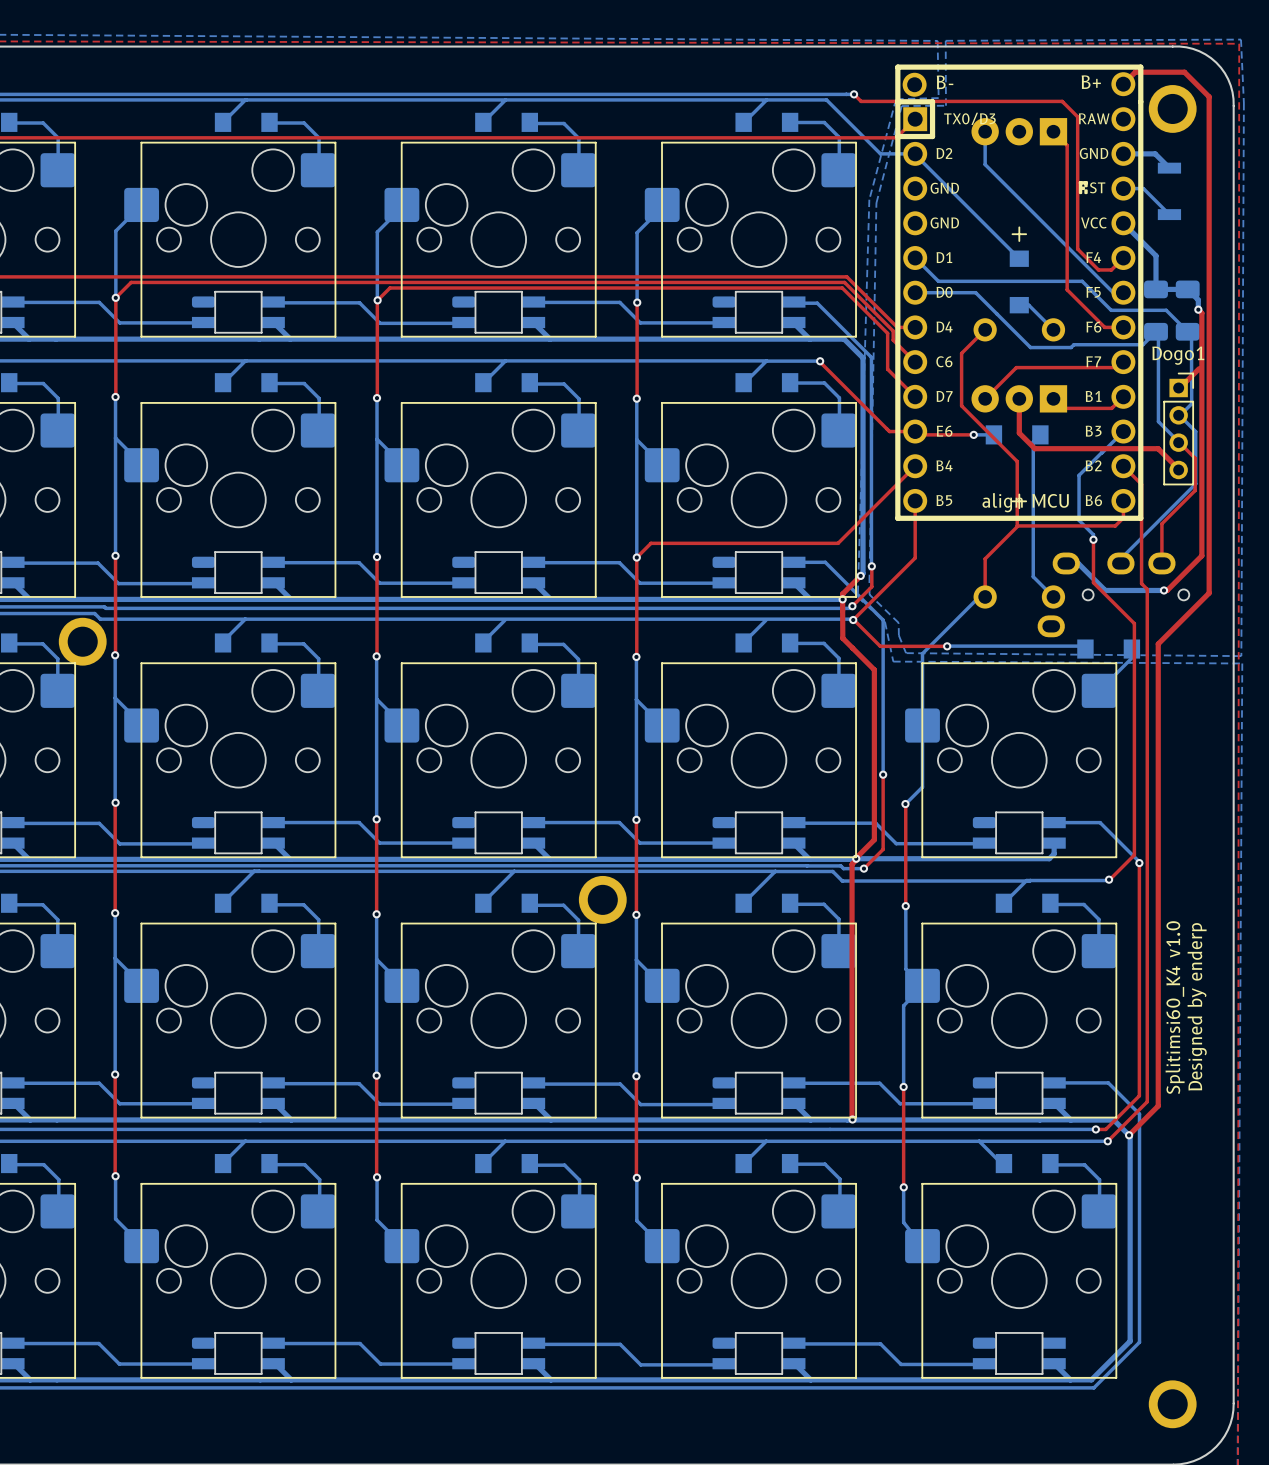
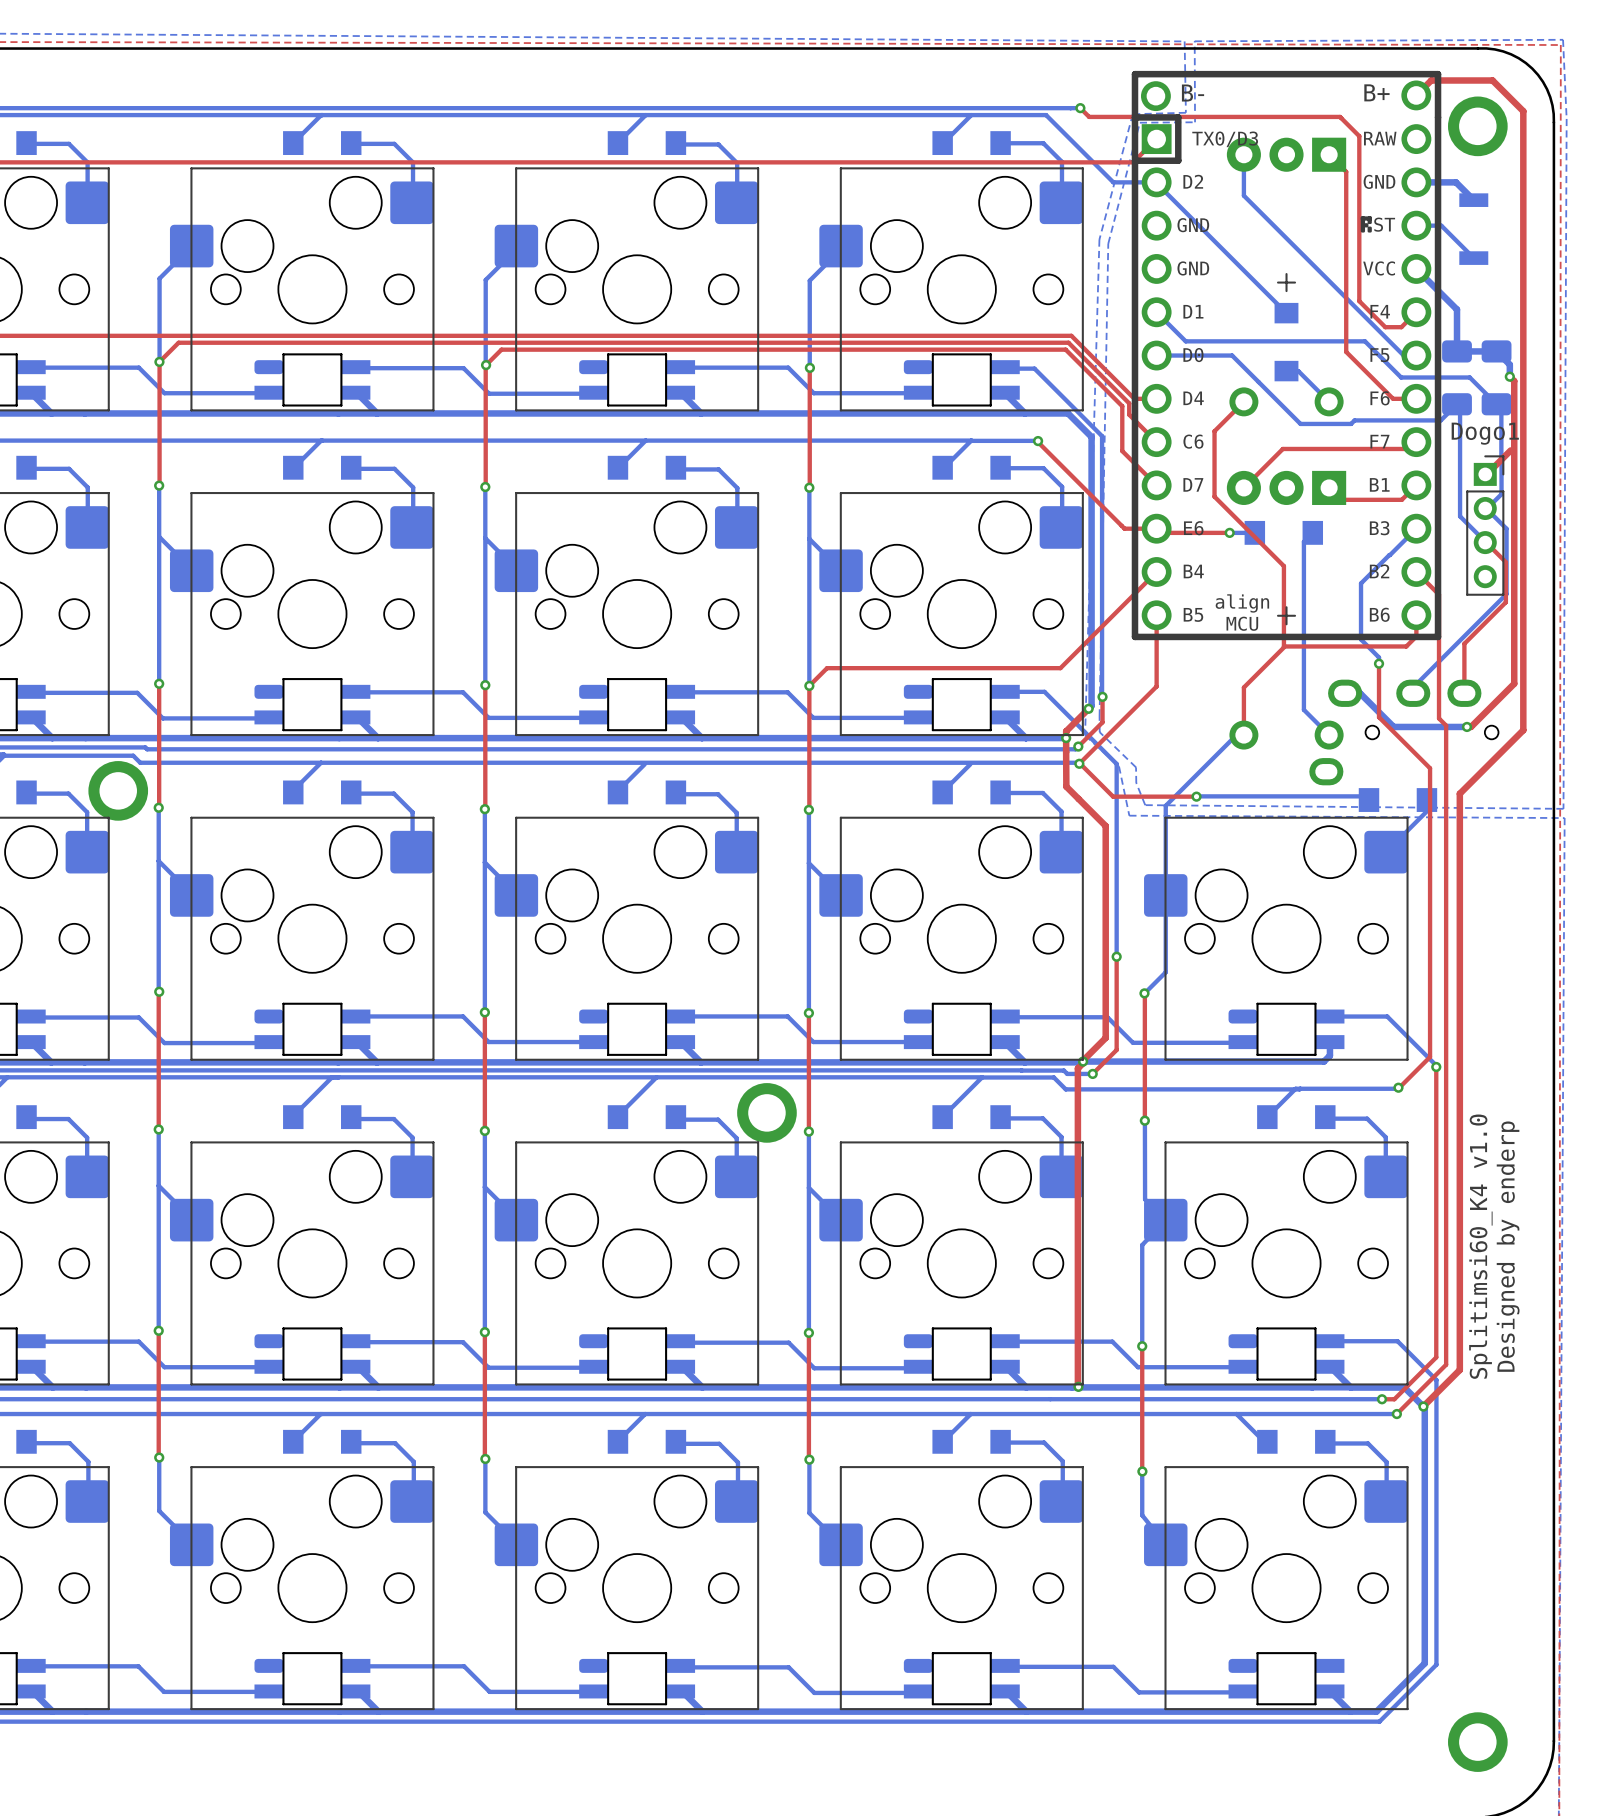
top track: (1019, 398) (1019, 433) (1034, 448) (1158, 448) (1179, 470) -> none
text: align MCU (1025, 502) -> align (1242, 603)
text: none -> MCU (1242, 623)

